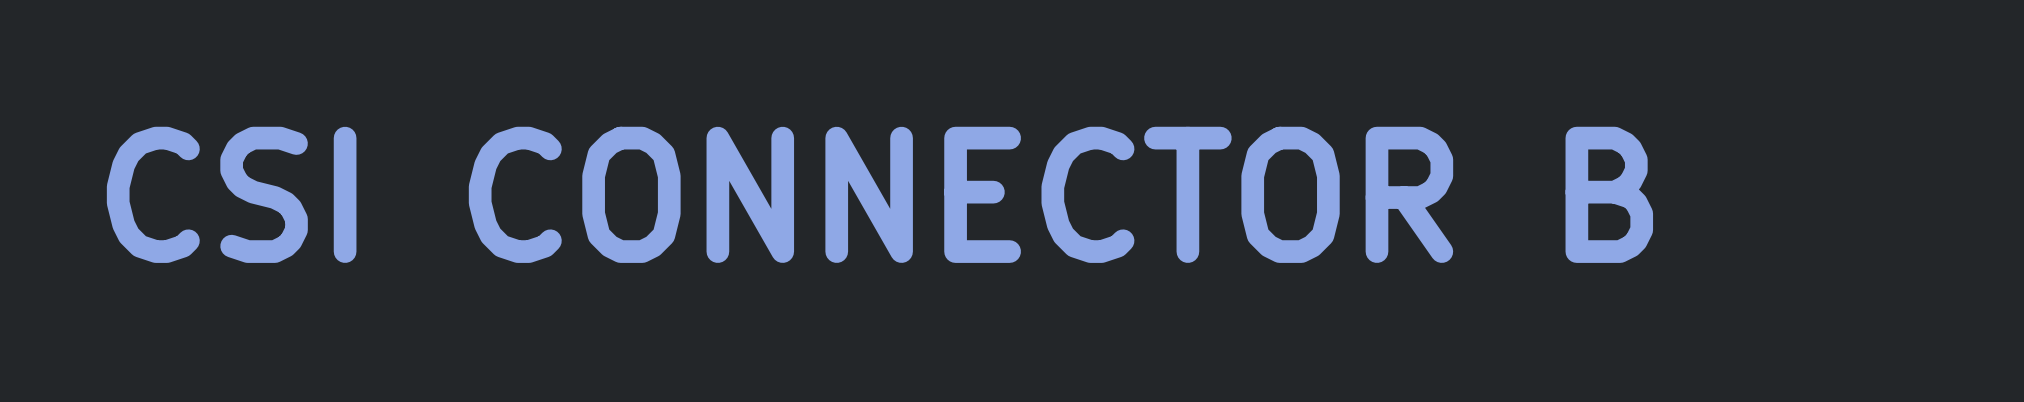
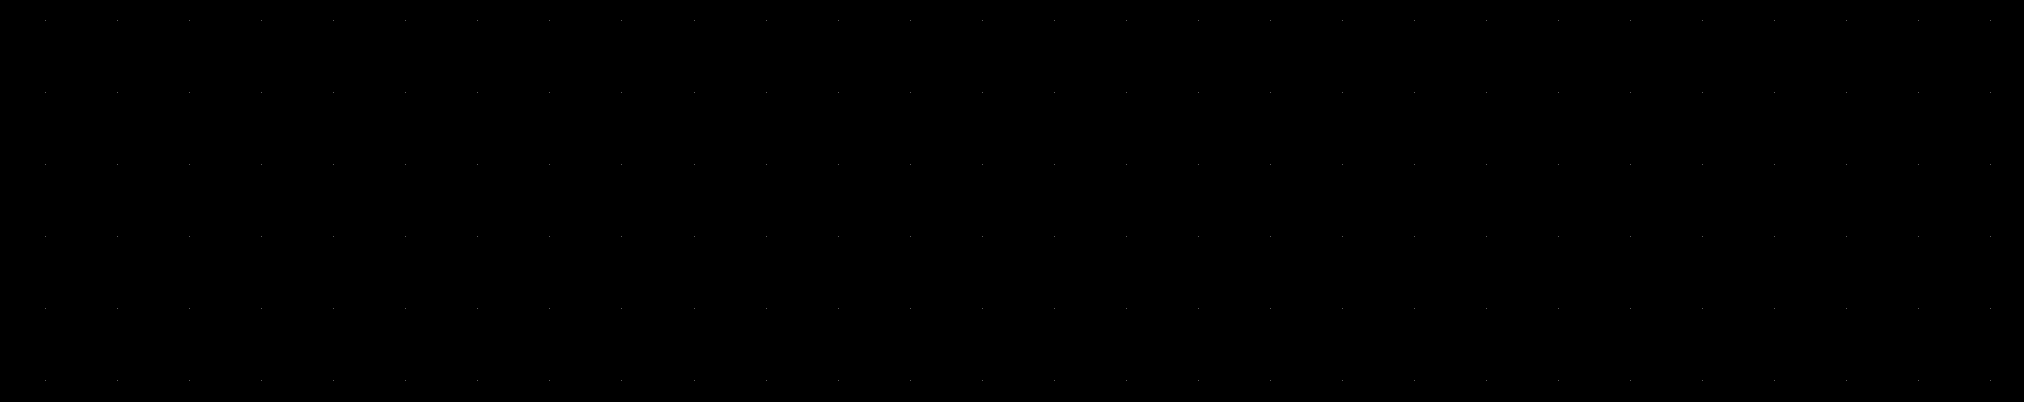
text: CSI CONNECTOR B (879, 194) -> none

